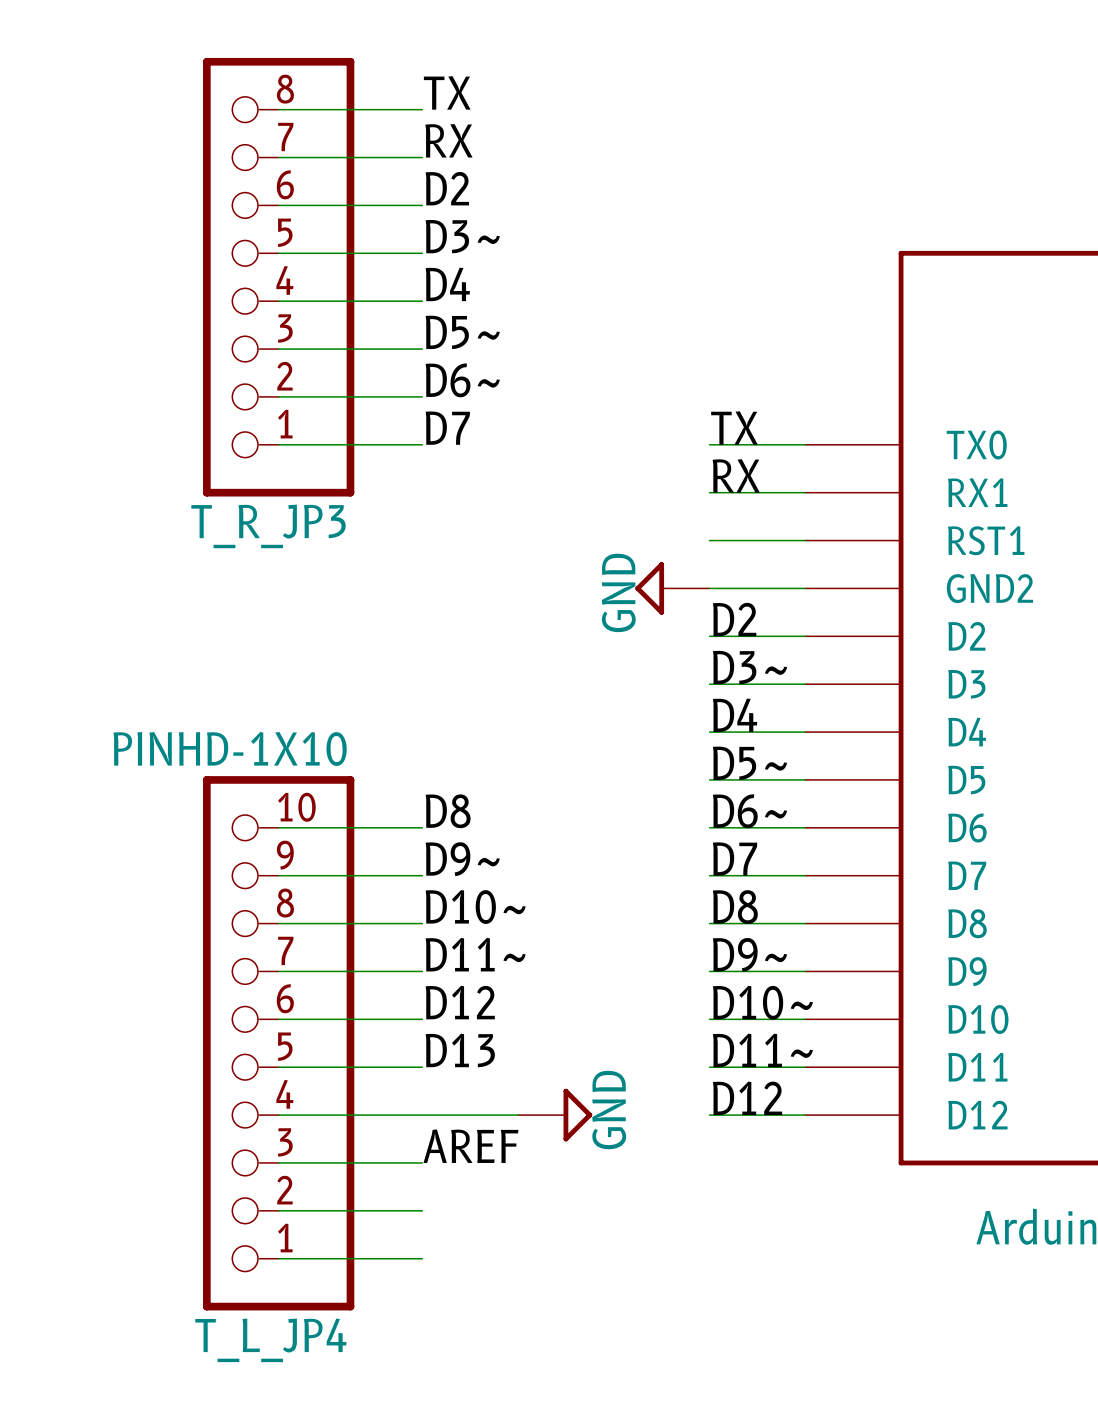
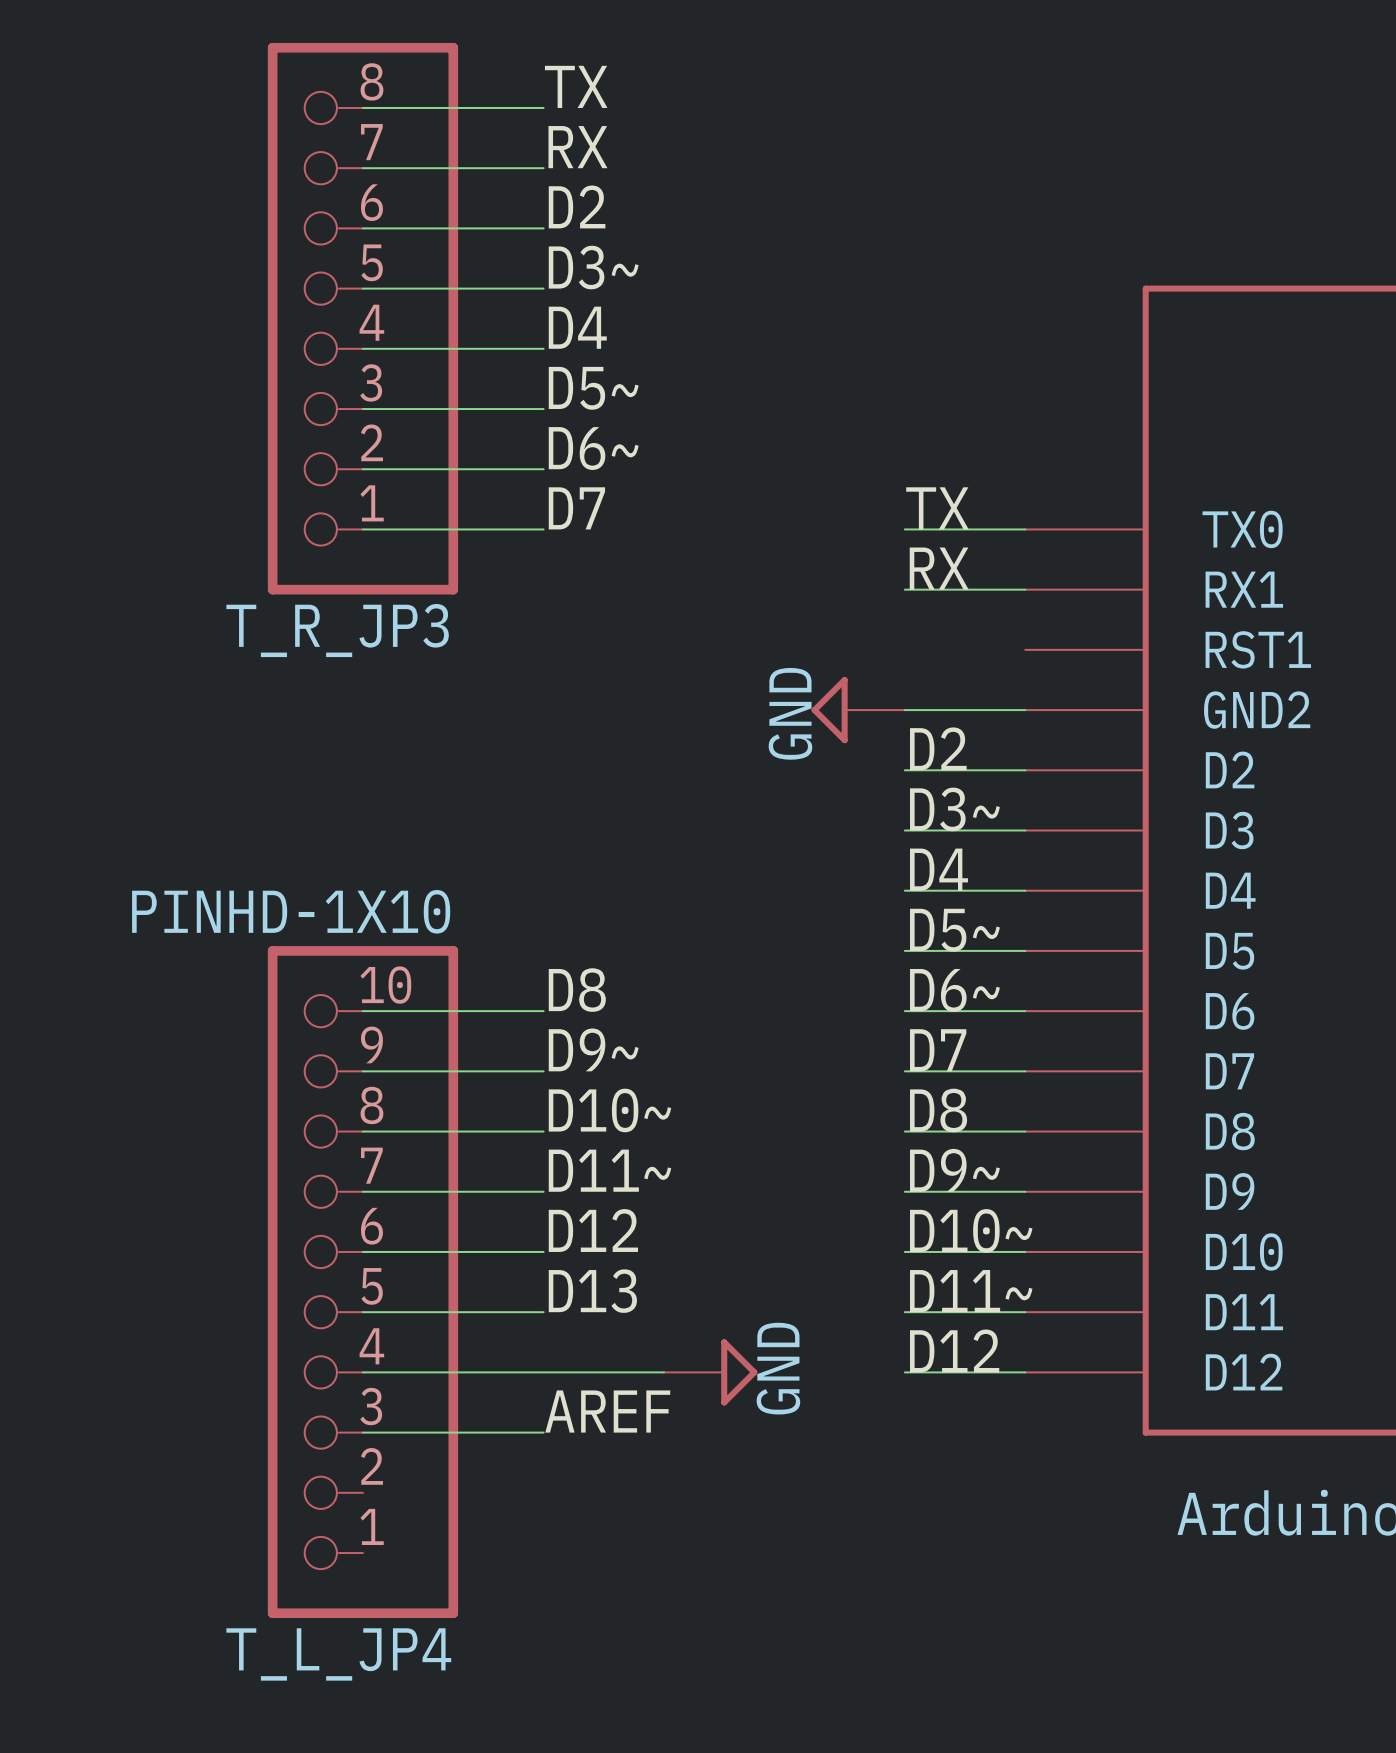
wire: (709, 540) (805, 540) -> none
wire: (278, 1210) (422, 1210) -> none
wire: (278, 1258) (422, 1258) -> none

